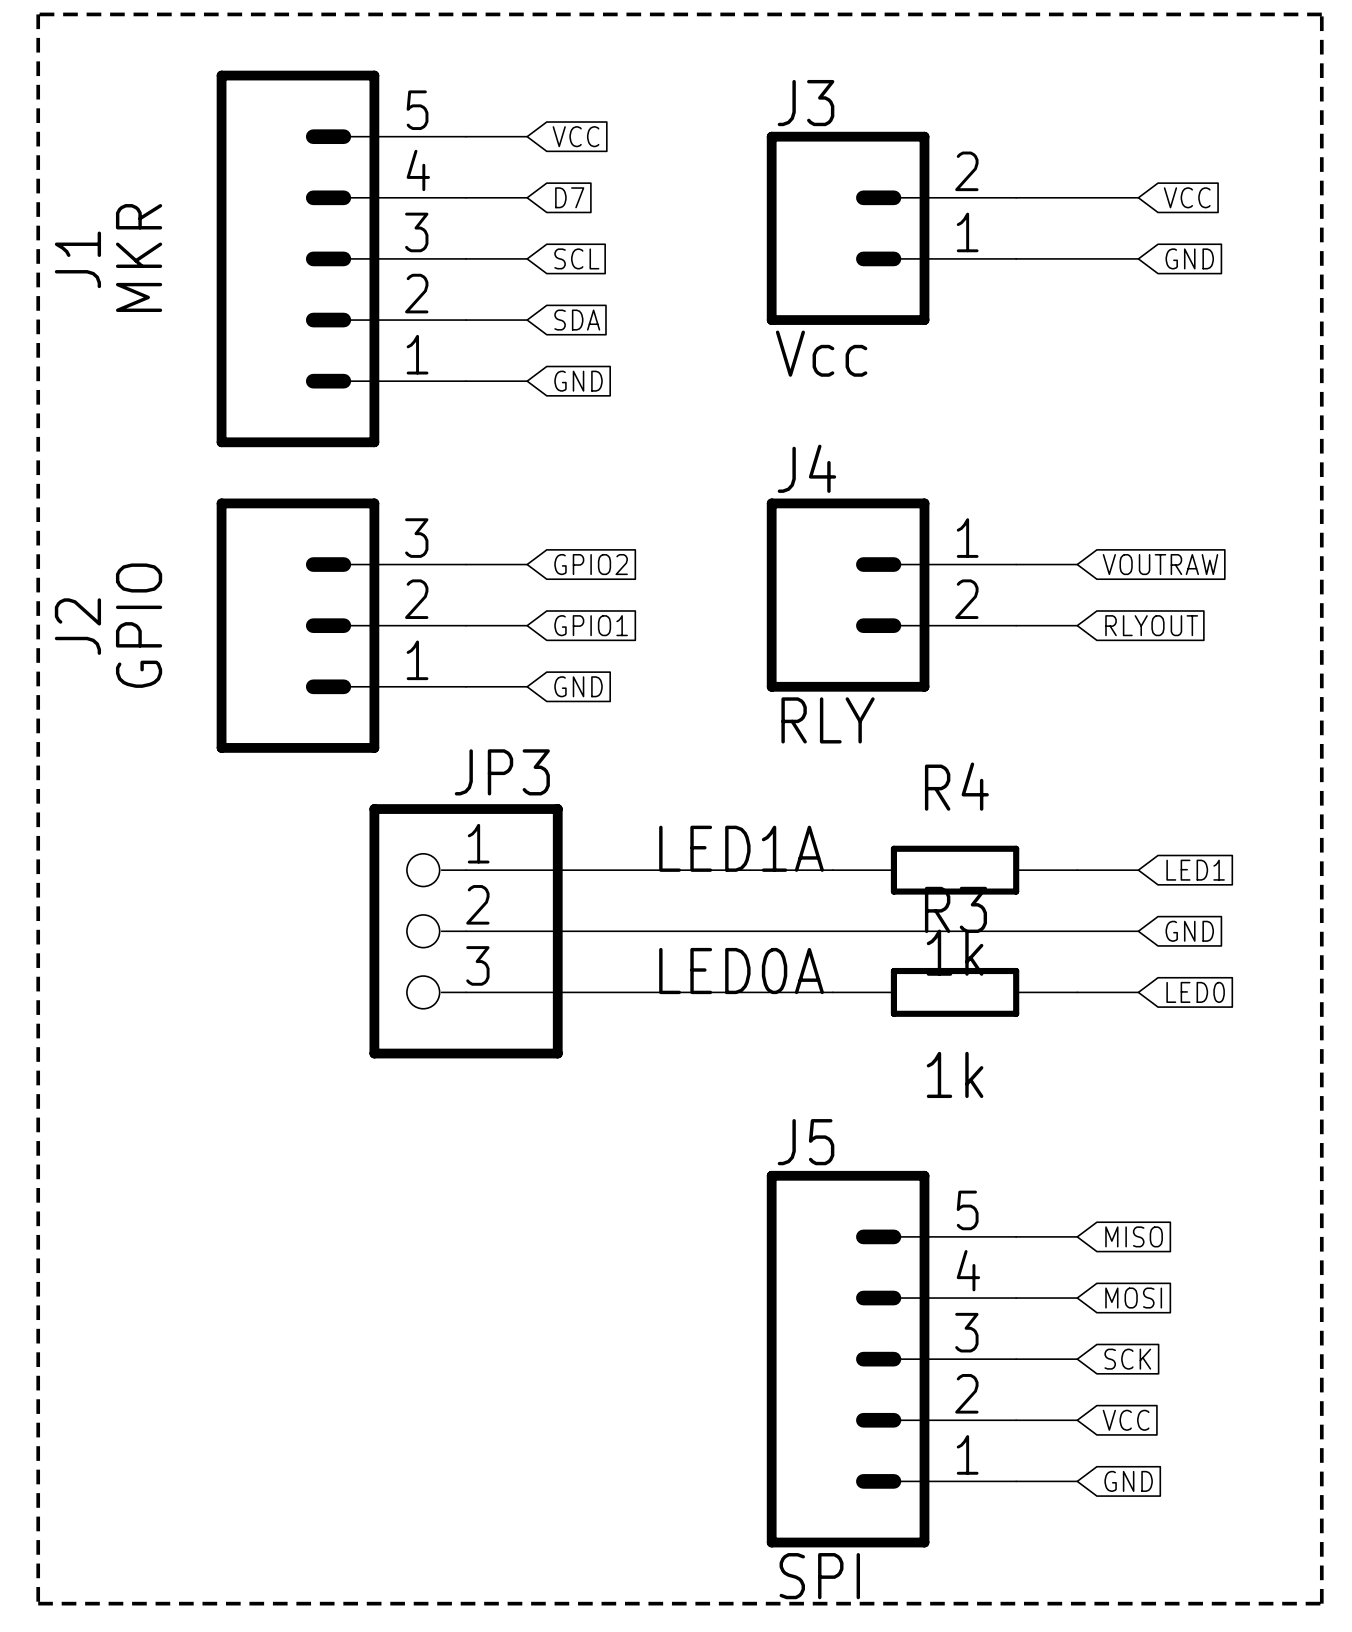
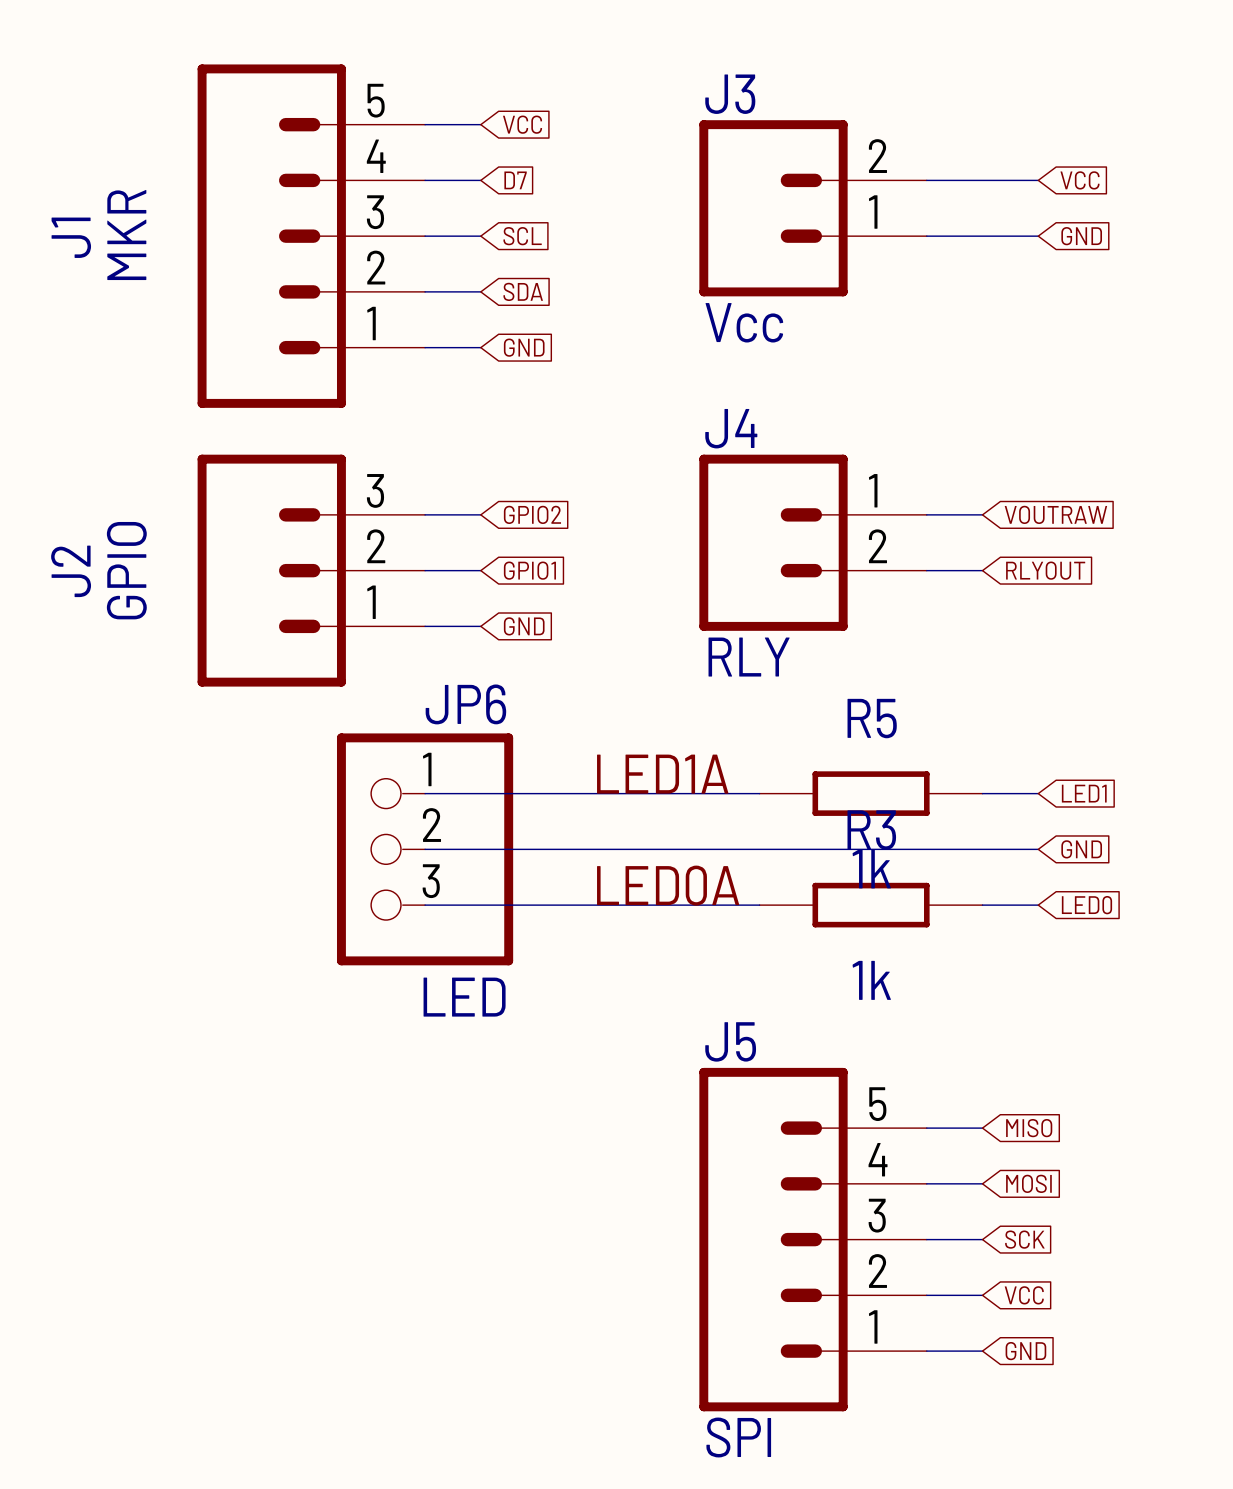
line: (38, 14) (1321, 14) (1321, 1603) (38, 1603) (38, 14) -> none
JP3 name: JP3 (502, 772) -> JP6 (465, 704)
R4 name: R4 (956, 786) -> R5 (872, 718)
JP3 value: none -> LED (464, 997)

